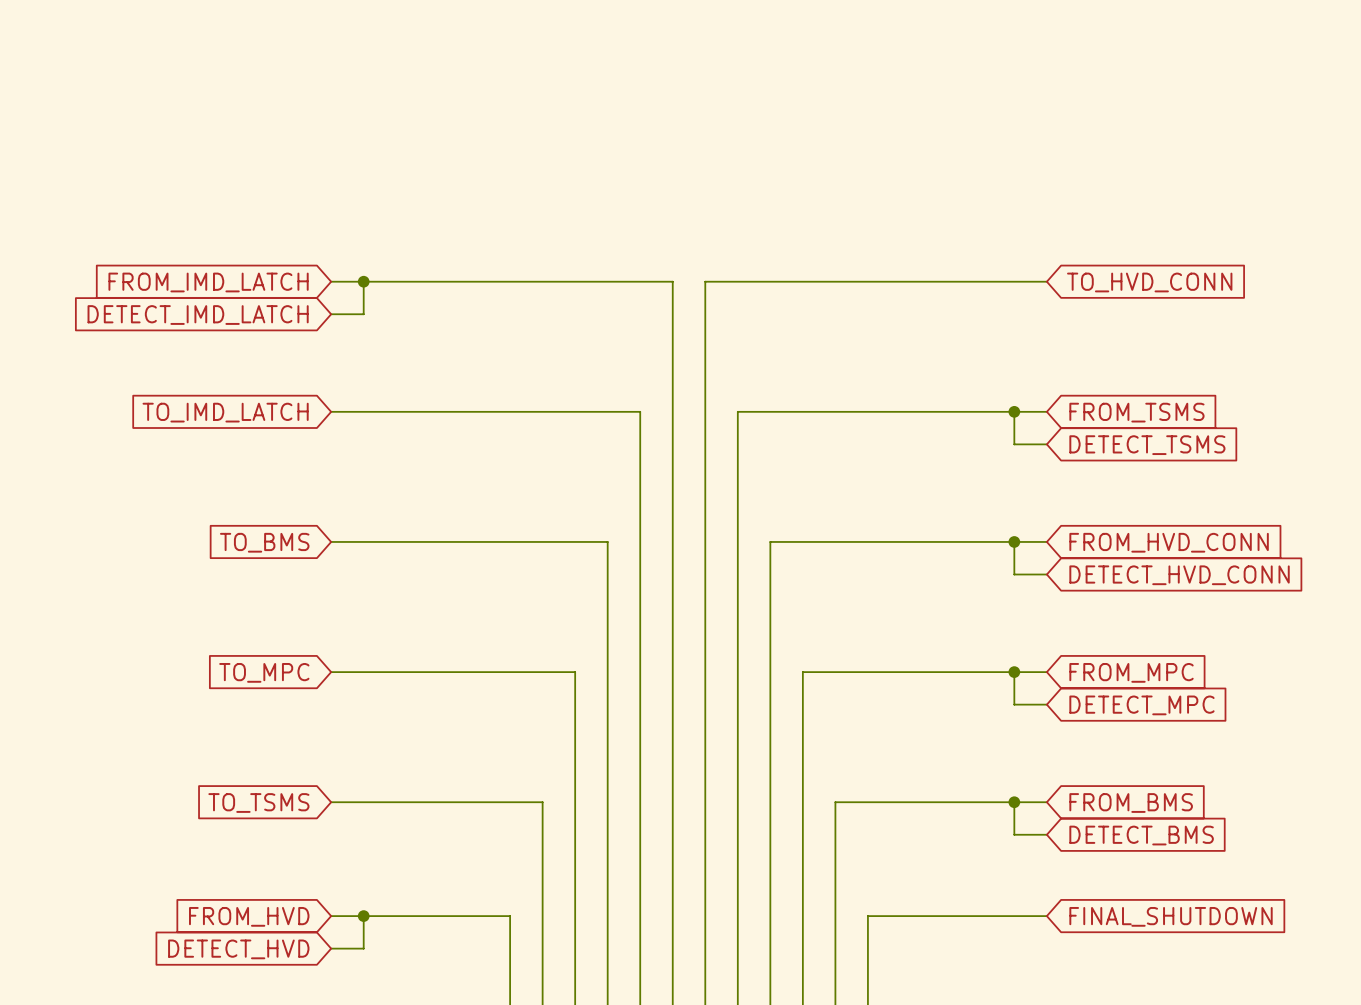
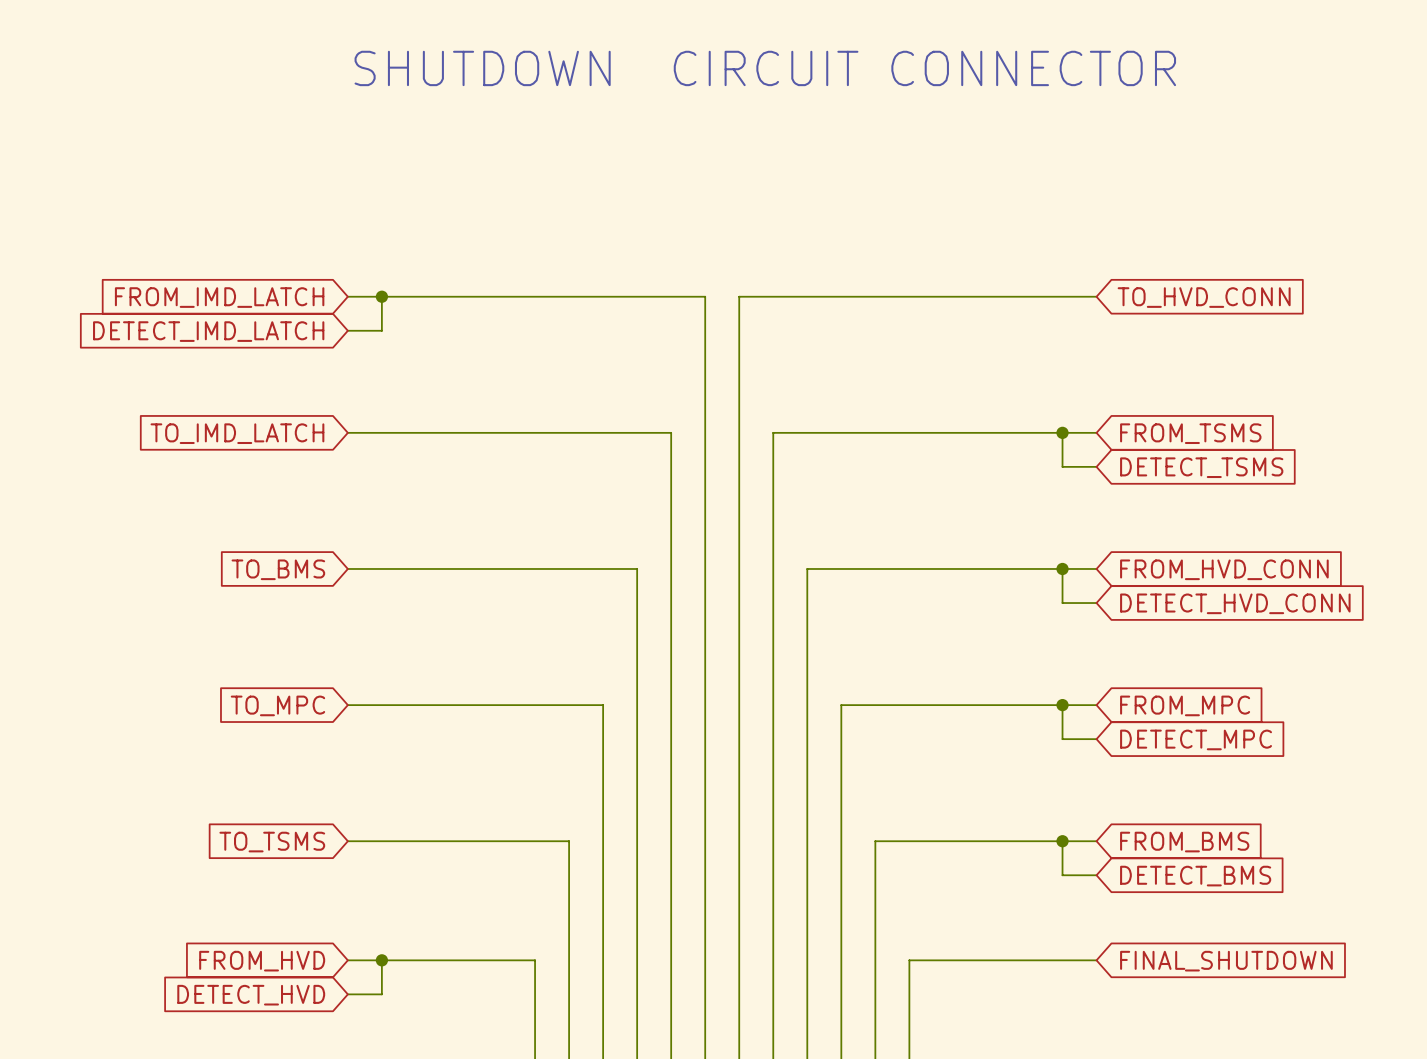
text: none -> SHUTDOWN CIRCUIT CONNECTOR (765, 68)

